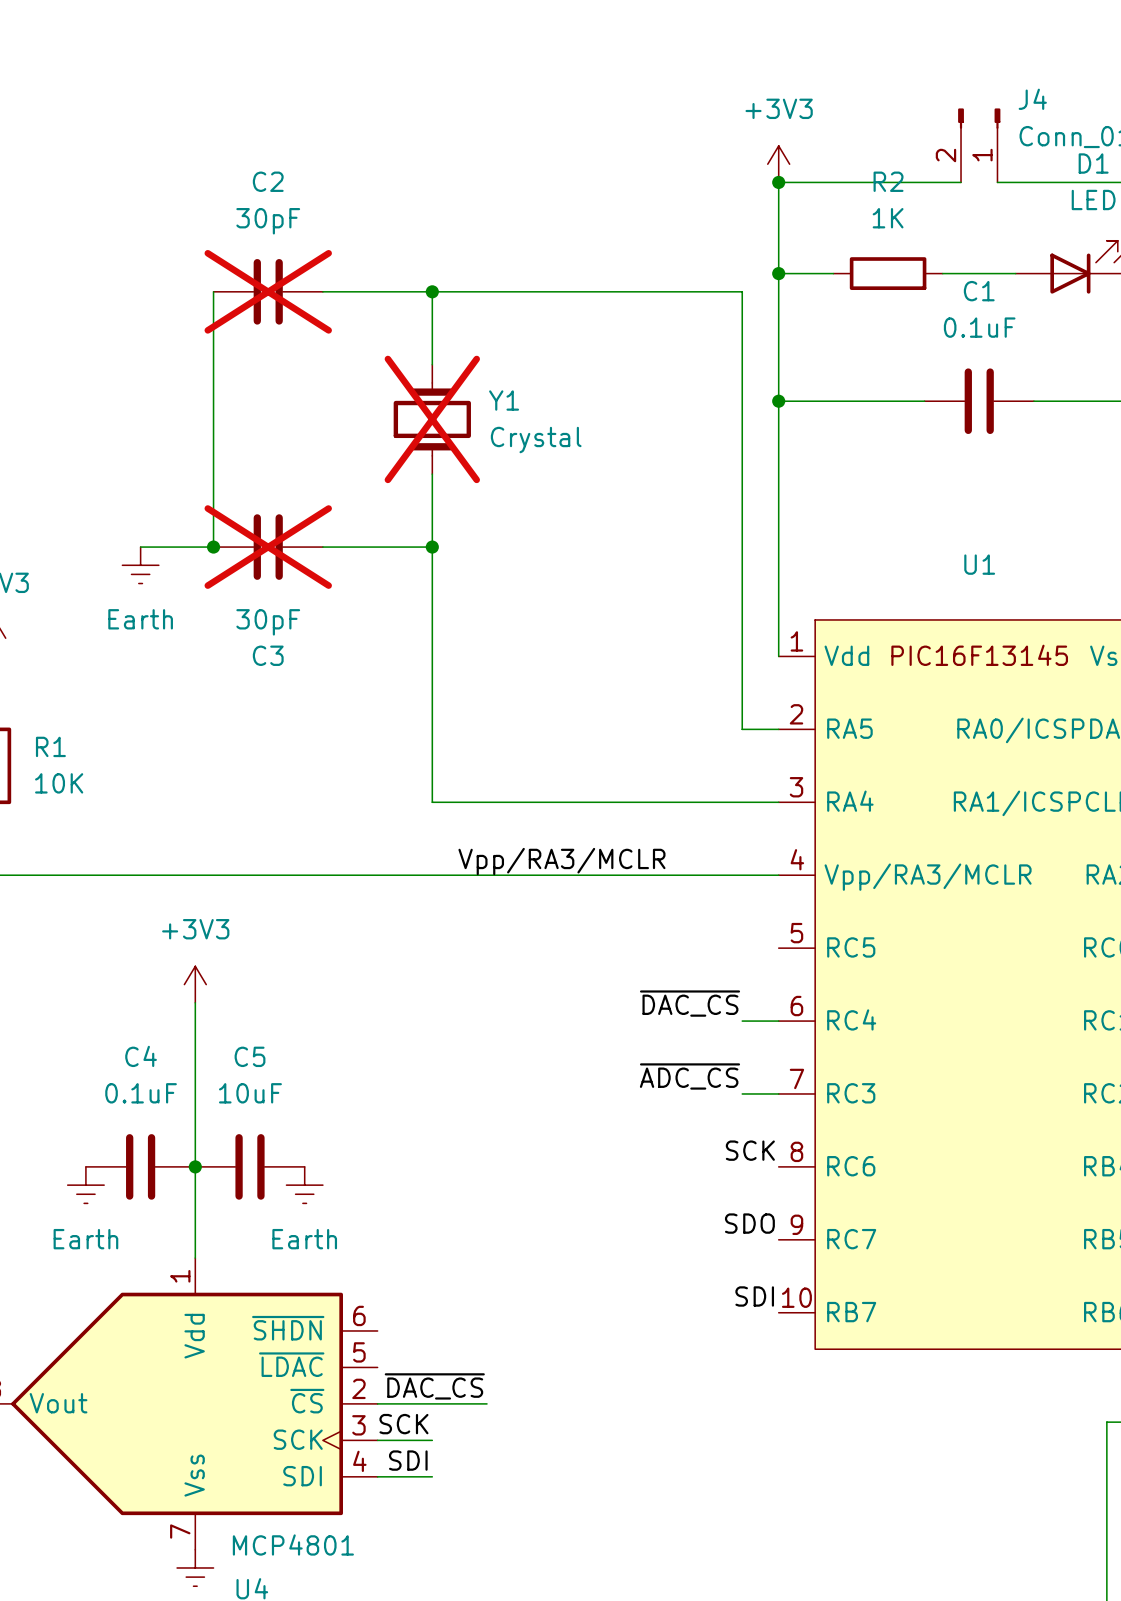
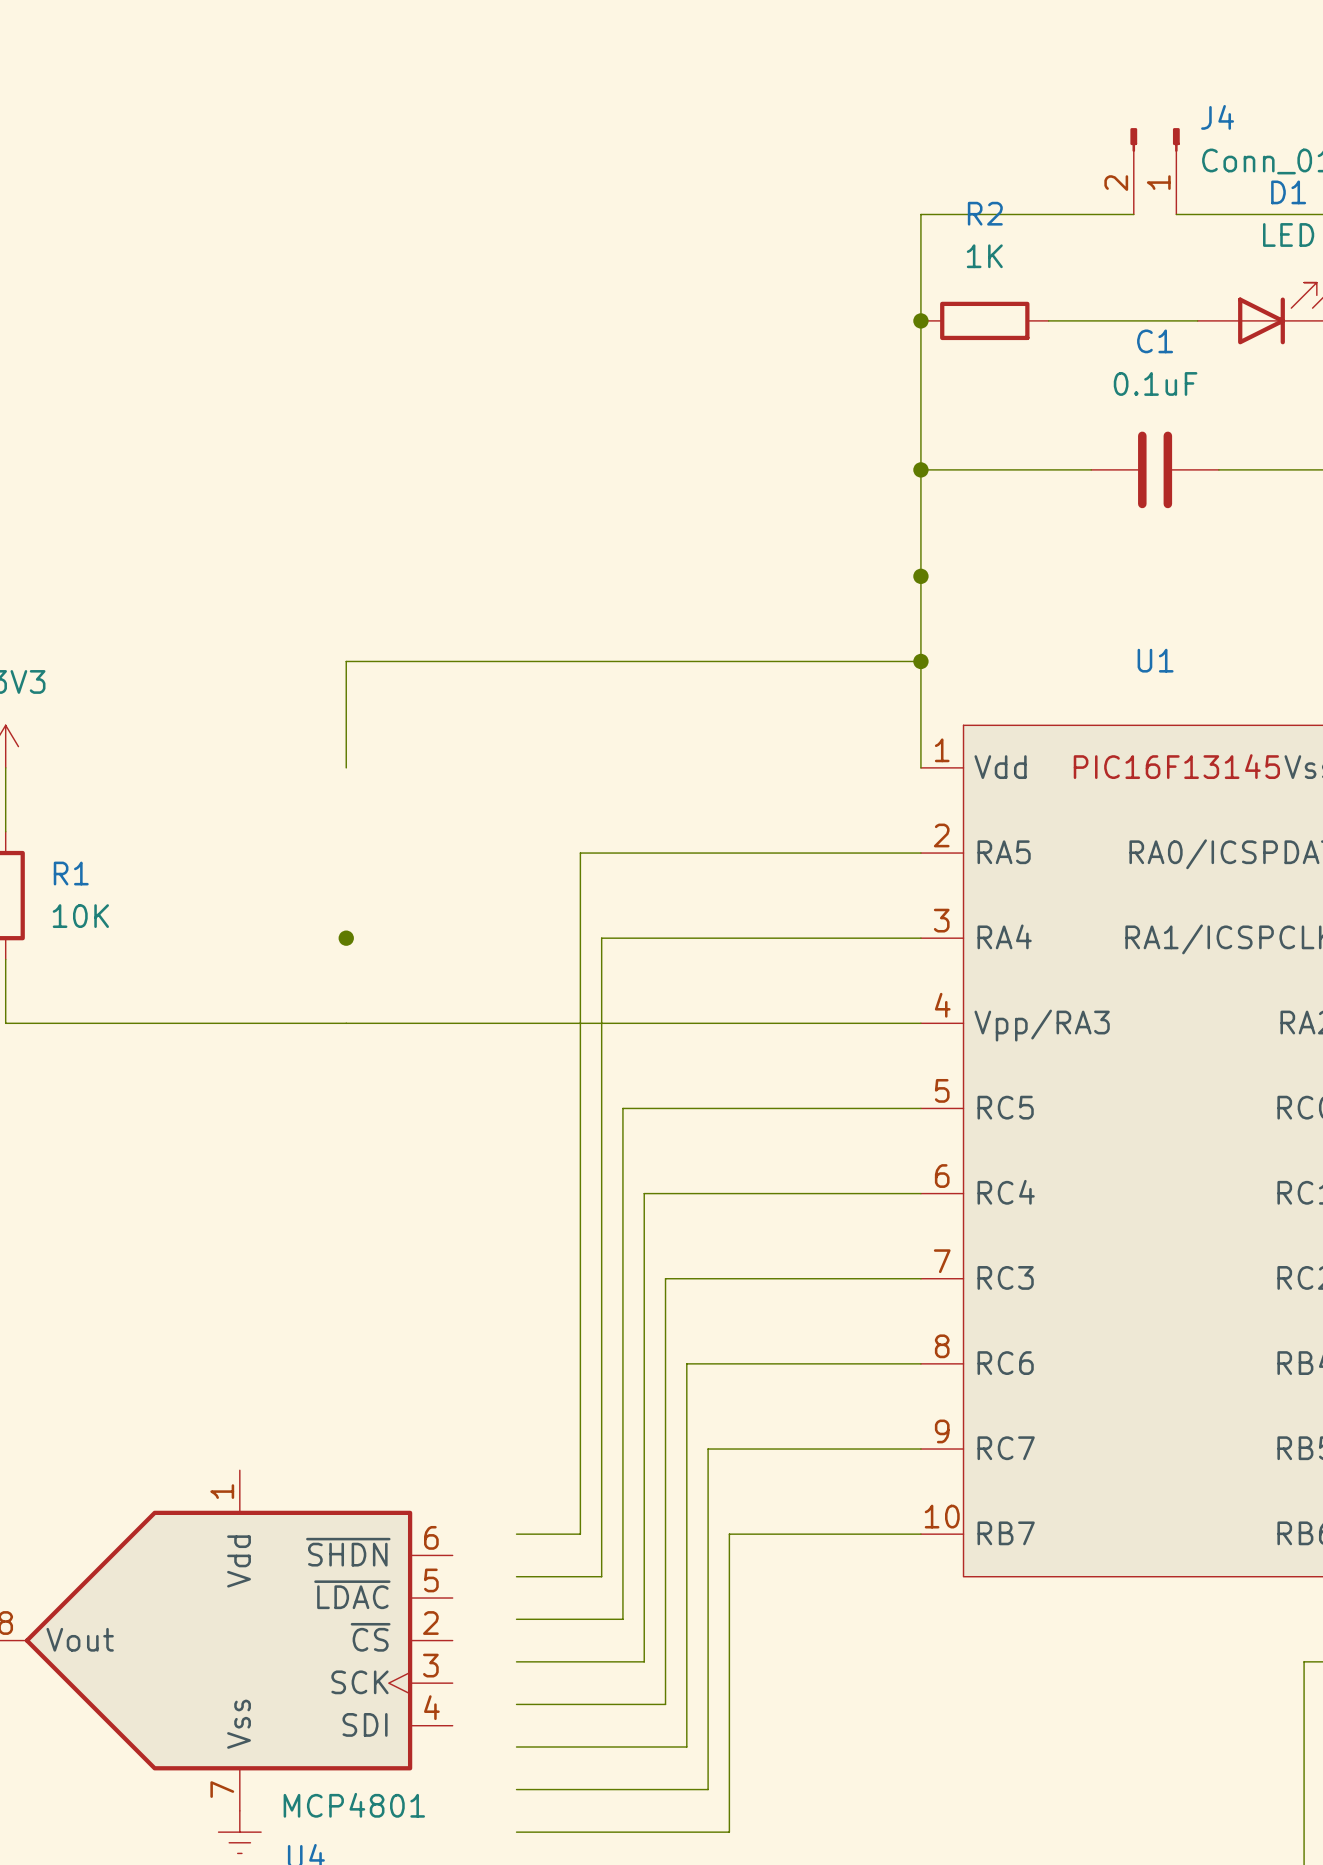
power symbol: +3V3 (778, 164) -> none
junction: (778, 182) -> none
wire: (778, 273) (833, 273) -> (1048, 320) (1112, 320)
R2 position: (888, 273) -> (984, 320)
wire: (213, 291) (213, 547) (140, 547) -> none
C2: 30pF (268, 291) -> none
wire: (322, 291) (742, 291) (742, 729) -> (516, 1534) (580, 1534) (580, 853) (878, 853)
wire: (432, 291) (432, 364) -> none
junction: (432, 291) -> none
Y1: Crystal (432, 419) -> none
wire: (432, 474) (432, 802) (505, 802) -> (516, 1576) (601, 1576) (601, 938)
junction: none -> (920, 576)
junction: (213, 547) -> none
C3: 30pF (268, 547) -> none
wire: (322, 547) (432, 547) -> none
junction: (432, 547) -> none
power symbol: Earth (140, 565) -> none
wire: none -> (920, 661) (346, 661) (346, 767)
junction: none -> (920, 661)
U1 text position: PIC16F13145 (979, 655) -> PIC16F13145 (1176, 766)
junction: none -> (346, 938)
label: Vpp/RA3/MCLR (561, 861) -> none
U1 pin name: Vpp/RA3/MCLR (928, 877) -> Vpp/RA3 (1042, 1025)
wire: none -> (920, 1108) (622, 1108) (622, 1619) (516, 1619)
power symbol: +3V3 (195, 984) -> none
wire: (195, 1002) (195, 1258) -> none
label: ~{DAC_CS} (690, 1003) -> none
wire: none -> (878, 1193) (644, 1193) (644, 1661) (516, 1661)
label: ~{ADC_CS} (689, 1076) -> none
wire: none -> (878, 1278) (665, 1278) (665, 1704) (516, 1704)
label: SCK (750, 1150) -> none
C4: 0.1uF (140, 1166) -> none
junction: (195, 1166) -> none
C5: 10uF (250, 1166) -> none
wire: none -> (920, 1363) (686, 1363) (686, 1747) (516, 1747)
power symbol: Earth (85, 1185) -> none
power symbol: Earth (304, 1185) -> none
label: SDO (749, 1223) -> none
wire: none -> (920, 1449) (708, 1449) (708, 1789) (516, 1789)
label: SDI (754, 1296) -> none
wire: none -> (920, 1534) (729, 1534) (729, 1832) (516, 1832)
label: ~{DAC_CS} (434, 1386) -> none
wire: (377, 1403) (487, 1403) -> none
label: SCK (403, 1424) -> none
wire: (377, 1440) (432, 1440) -> none
label: SDI (408, 1460) -> none
wire: (377, 1476) (432, 1476) -> none

